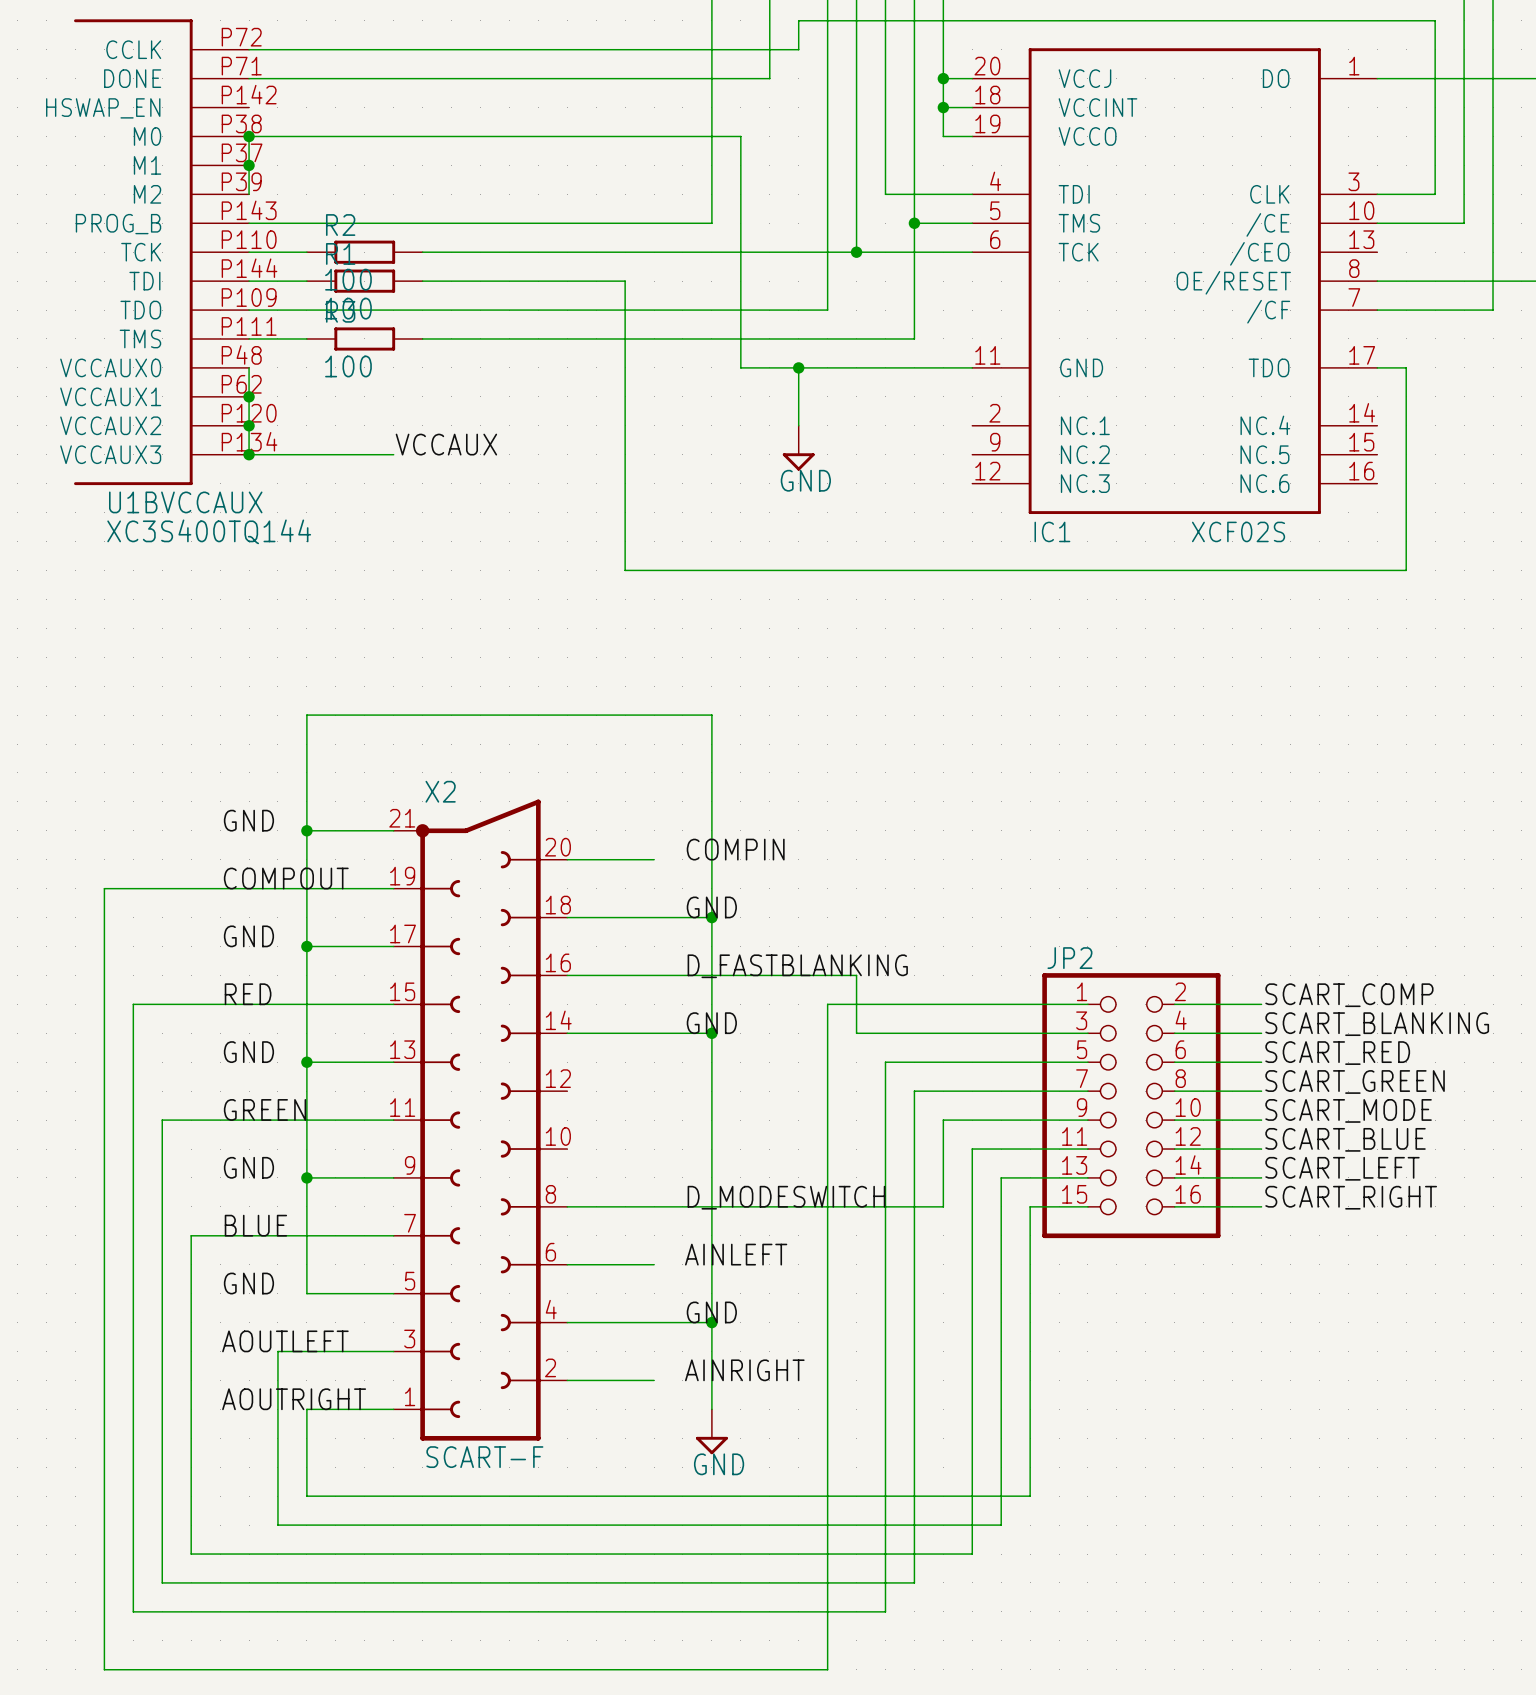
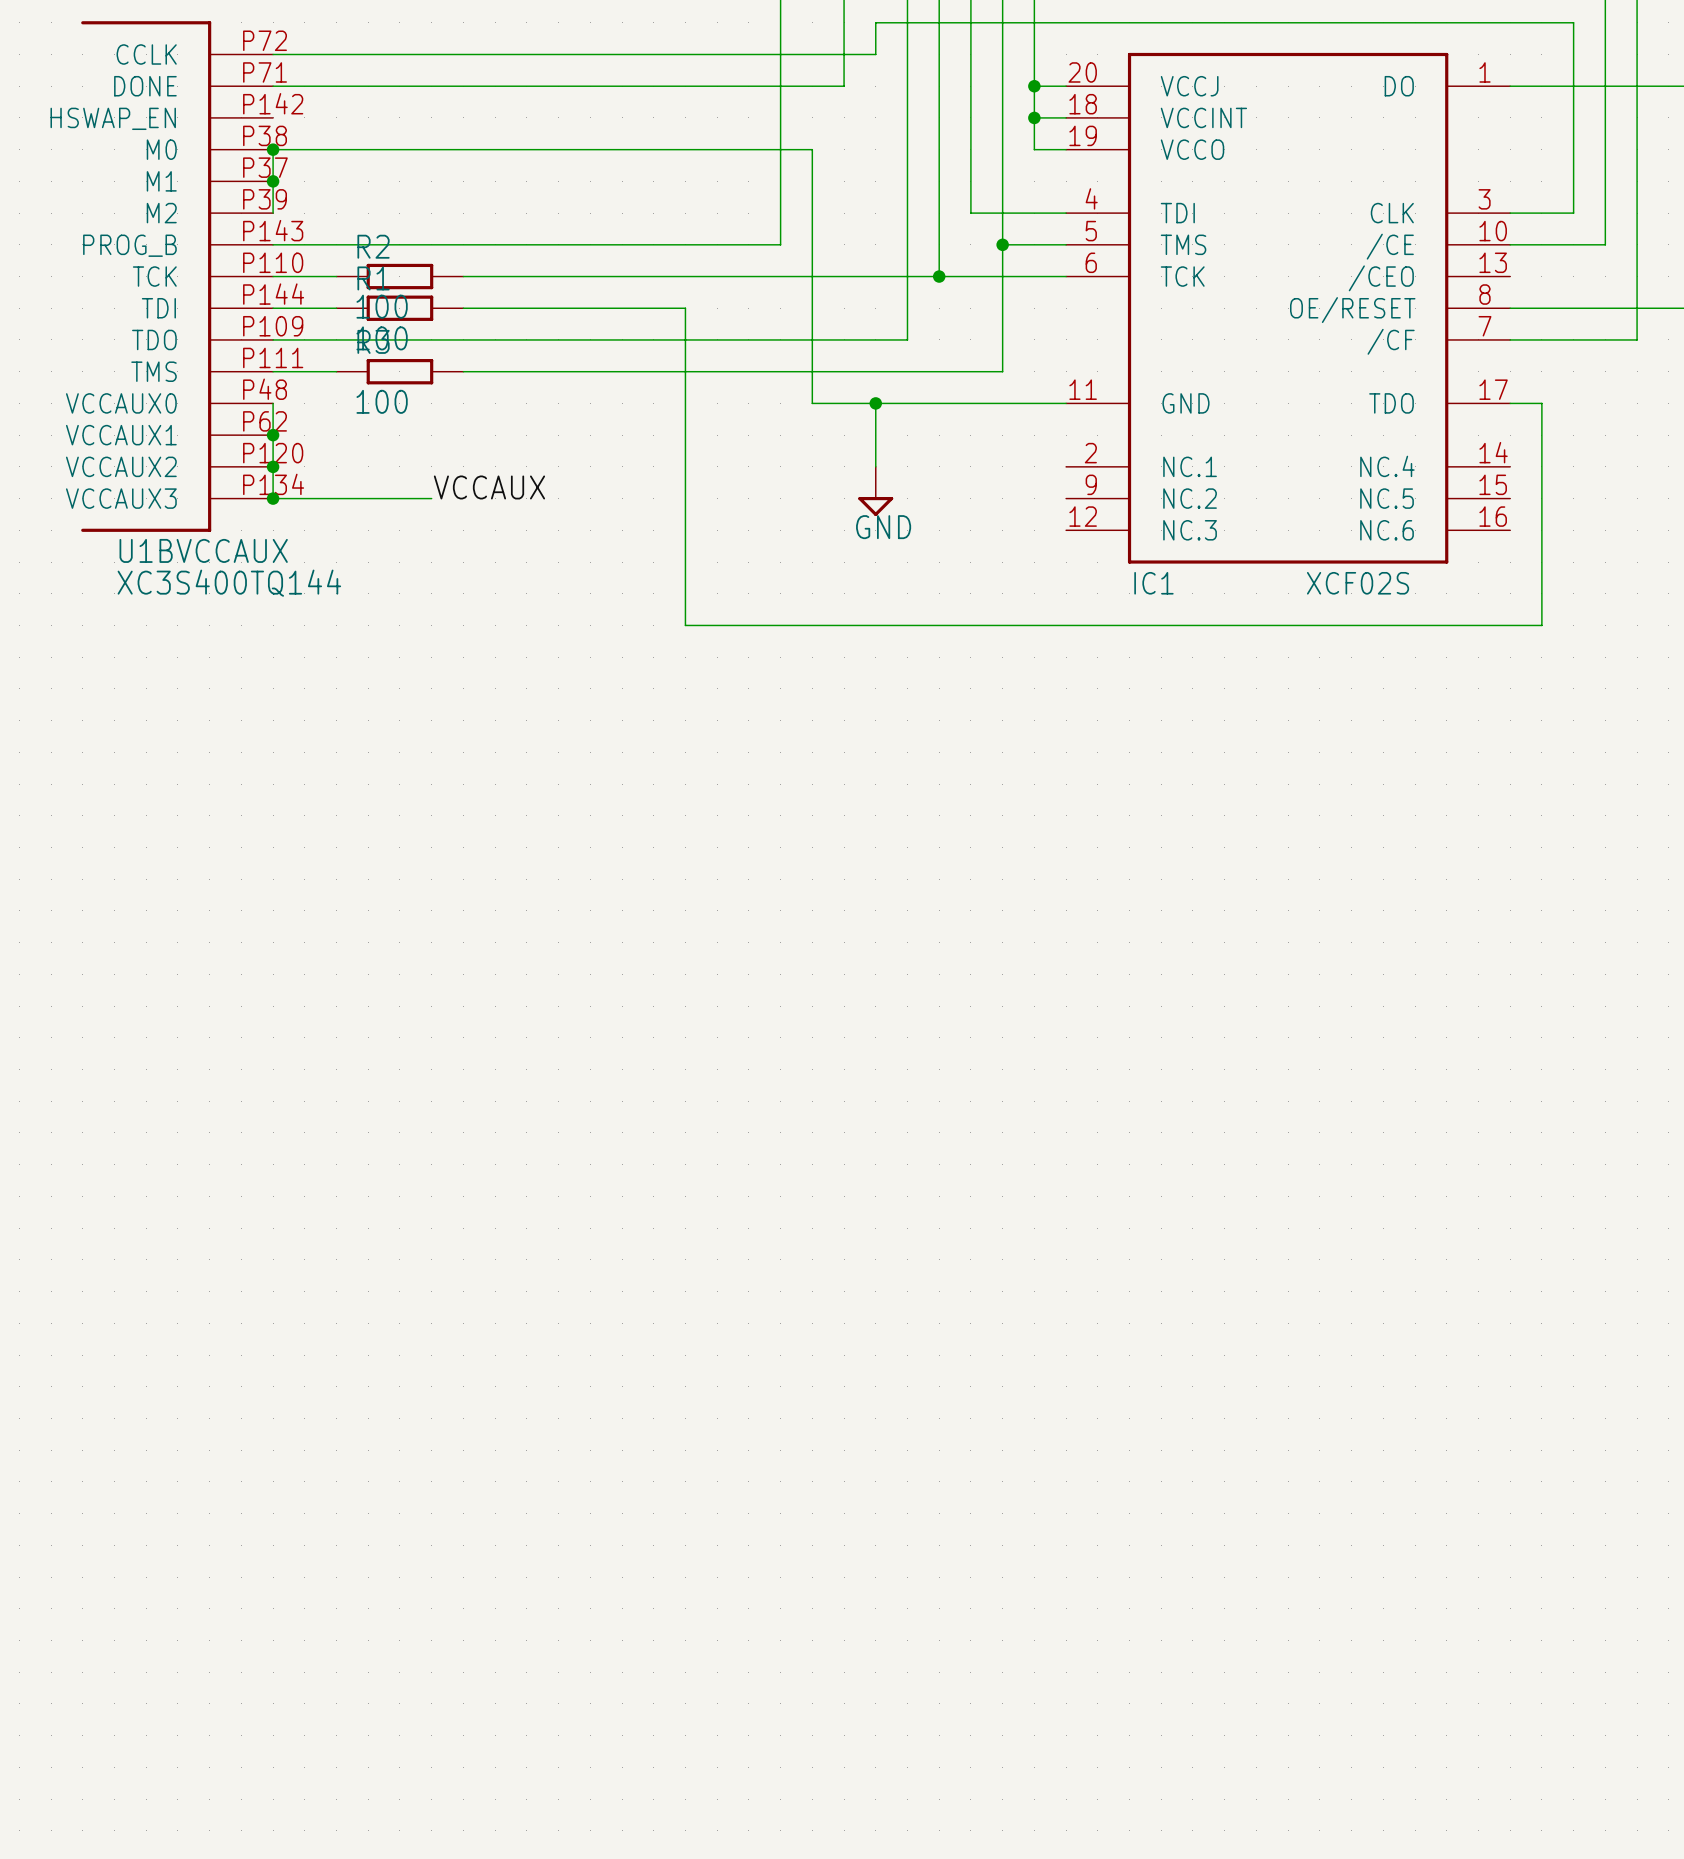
label: GND (248, 820) -> none
wire: (306, 830) (393, 830) -> none
junction: (306, 830) -> none
label: COMPIN (735, 849) -> none
wire: (567, 859) (654, 859) -> none
label: COMPOUT (286, 878) -> none
wire: (393, 888) (104, 888) (104, 1669) (827, 1669) (827, 1004) (1087, 1004) -> none
label: GND (711, 907) -> none
wire: (567, 917) (711, 917) -> none
junction: (711, 917) -> none
label: GND (248, 936) -> none
wire: (306, 946) (393, 946) -> none
junction: (306, 946) -> none
label: D_FASTBLANKING (797, 966) -> none
wire: (567, 975) (856, 975) (856, 1033) (1087, 1033) -> none
label: RED (248, 994) -> none
label: SCART_COMP (1349, 995) -> none
wire: (393, 1004) (133, 1004) (133, 1611) (885, 1611) (885, 1062) (1087, 1062) -> none
wire: (1174, 1004) (1261, 1004) -> none
label: GND (711, 1023) -> none
label: SCART_BLANKING (1377, 1024) -> none
wire: (567, 1033) (711, 1033) -> none
junction: (711, 1033) -> none
wire: (1174, 1033) (1261, 1033) -> none
label: GND (248, 1052) -> none
label: SCART_RED (1337, 1053) -> none
wire: (306, 1062) (393, 1062) -> none
junction: (306, 1062) -> none
wire: (1174, 1062) (1261, 1062) -> none
label: SCART_GREEN (1355, 1081) -> none
wire: (1087, 1091) (914, 1091) (914, 1582) (162, 1582) (162, 1120) (393, 1120) -> none
wire: (1174, 1091) (1261, 1091) -> none
JP2: (1131, 1105) -> none
label: GREEN (265, 1109) -> none
label: SCART_MODE (1348, 1110) -> none
X2: SCART-F (480, 1120) -> none
wire: (1087, 1120) (943, 1120) (943, 1206) (567, 1206) -> none
wire: (1174, 1120) (1261, 1120) -> none
label: SCART_BLUE (1345, 1139) -> none
wire: (1087, 1149) (972, 1149) (972, 1554) (191, 1554) (191, 1235) (393, 1235) -> none
wire: (1174, 1149) (1261, 1149) -> none
label: GND (248, 1167) -> none
label: SCART_LEFT (1342, 1168) -> none
wire: (306, 1177) (393, 1177) -> none
junction: (306, 1177) -> none
wire: (1087, 1177) (1001, 1177) (1001, 1525) (277, 1525) (277, 1351) (393, 1351) -> none
wire: (1174, 1177) (1261, 1177) -> none
label: D_MODESWITCH (786, 1197) -> none
label: SCART_RIGHT (1351, 1197) -> none
wire: (1087, 1206) (1030, 1206) (1030, 1496) (306, 1496) (306, 1409) (393, 1409) -> none
wire: (1174, 1206) (1261, 1206) -> none
label: BLUE (255, 1225) -> none
label: AINLEFT (736, 1254) -> none
wire: (567, 1264) (654, 1264) -> none
label: GND (248, 1283) -> none
wire: (393, 1293) (306, 1293) (306, 715) (711, 715) (711, 1409) -> none
label: GND (711, 1312) -> none
wire: (567, 1322) (711, 1322) -> none
junction: (711, 1322) -> none
label: AOUTLEFT (285, 1341) -> none
label: AINRIGHT (744, 1370) -> none
wire: (567, 1380) (654, 1380) -> none
label: AOUTRIGHT (294, 1399) -> none
power symbol: GND (711, 1431) -> none

